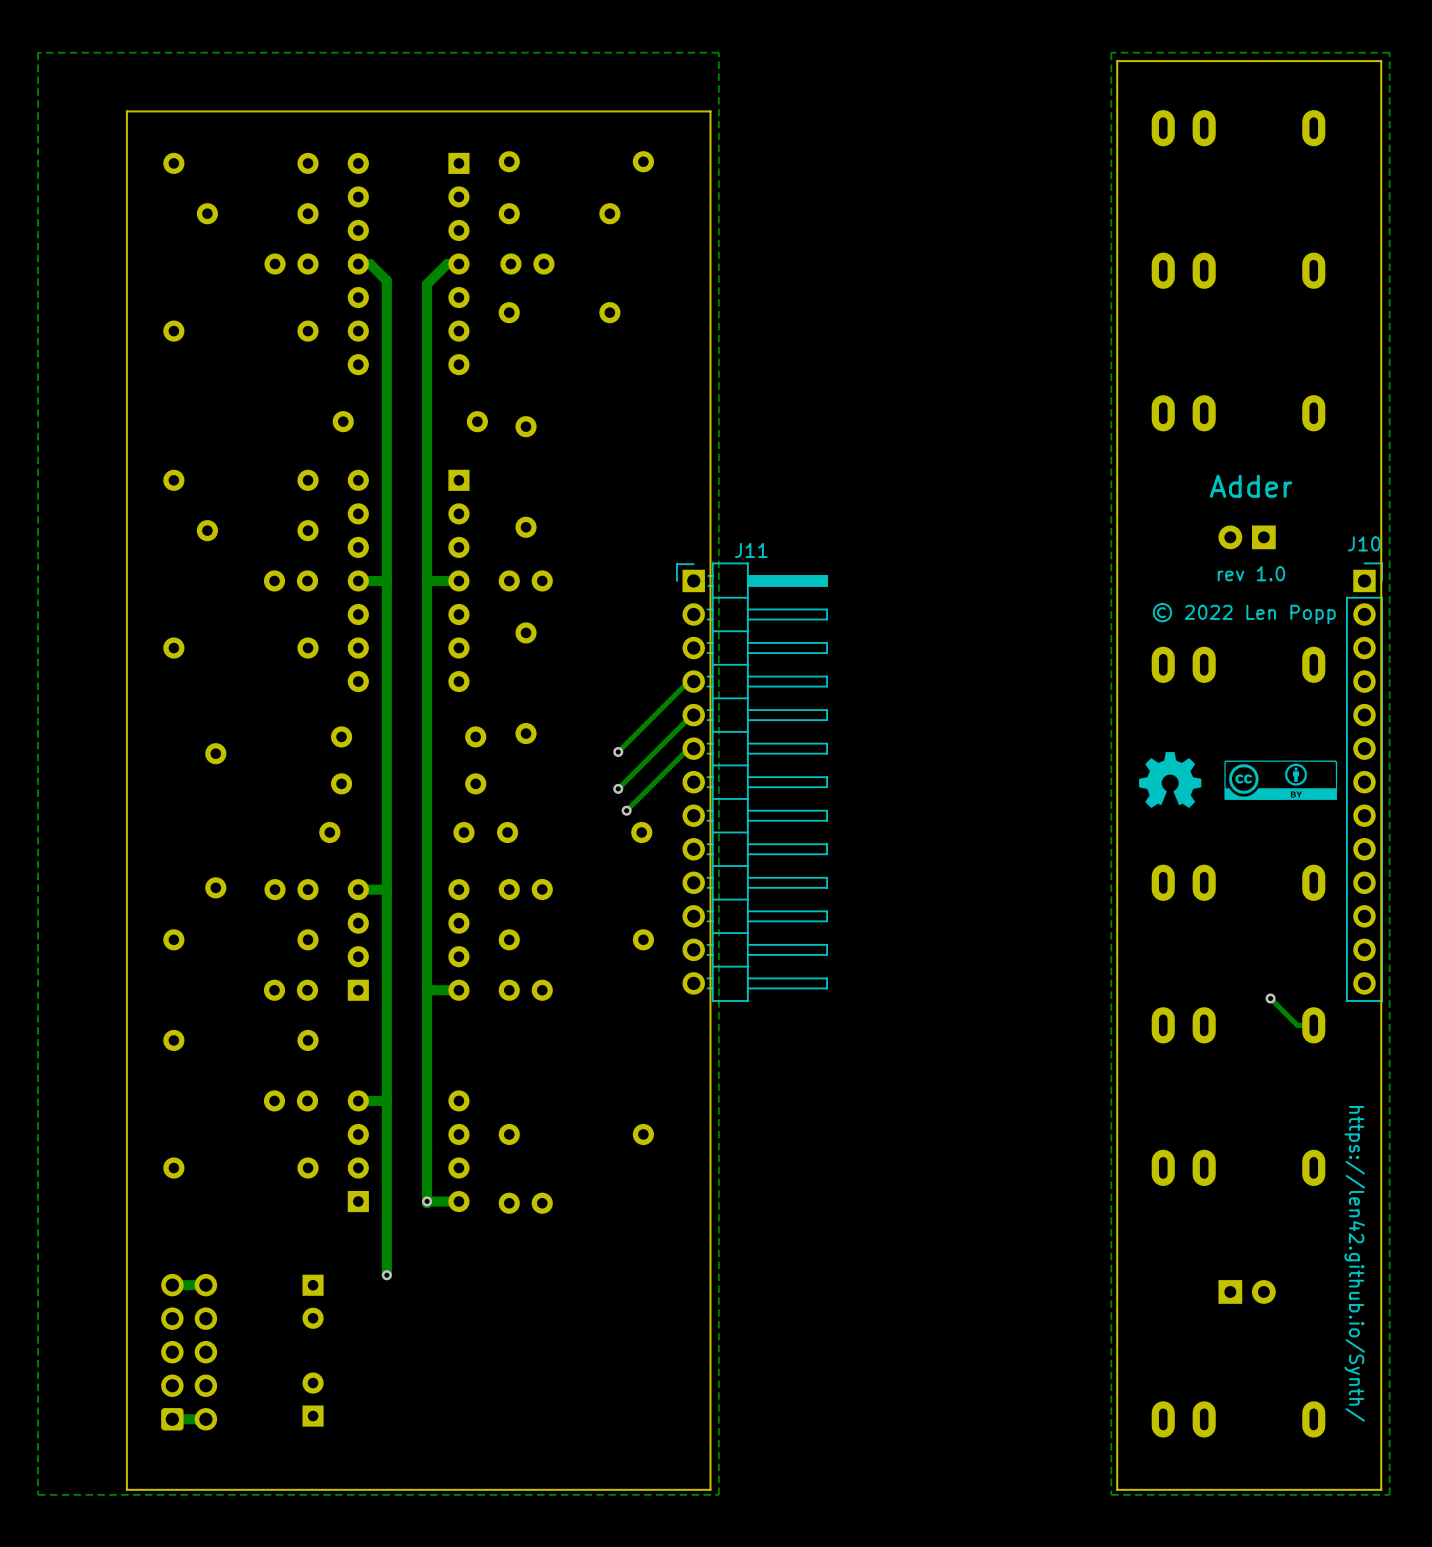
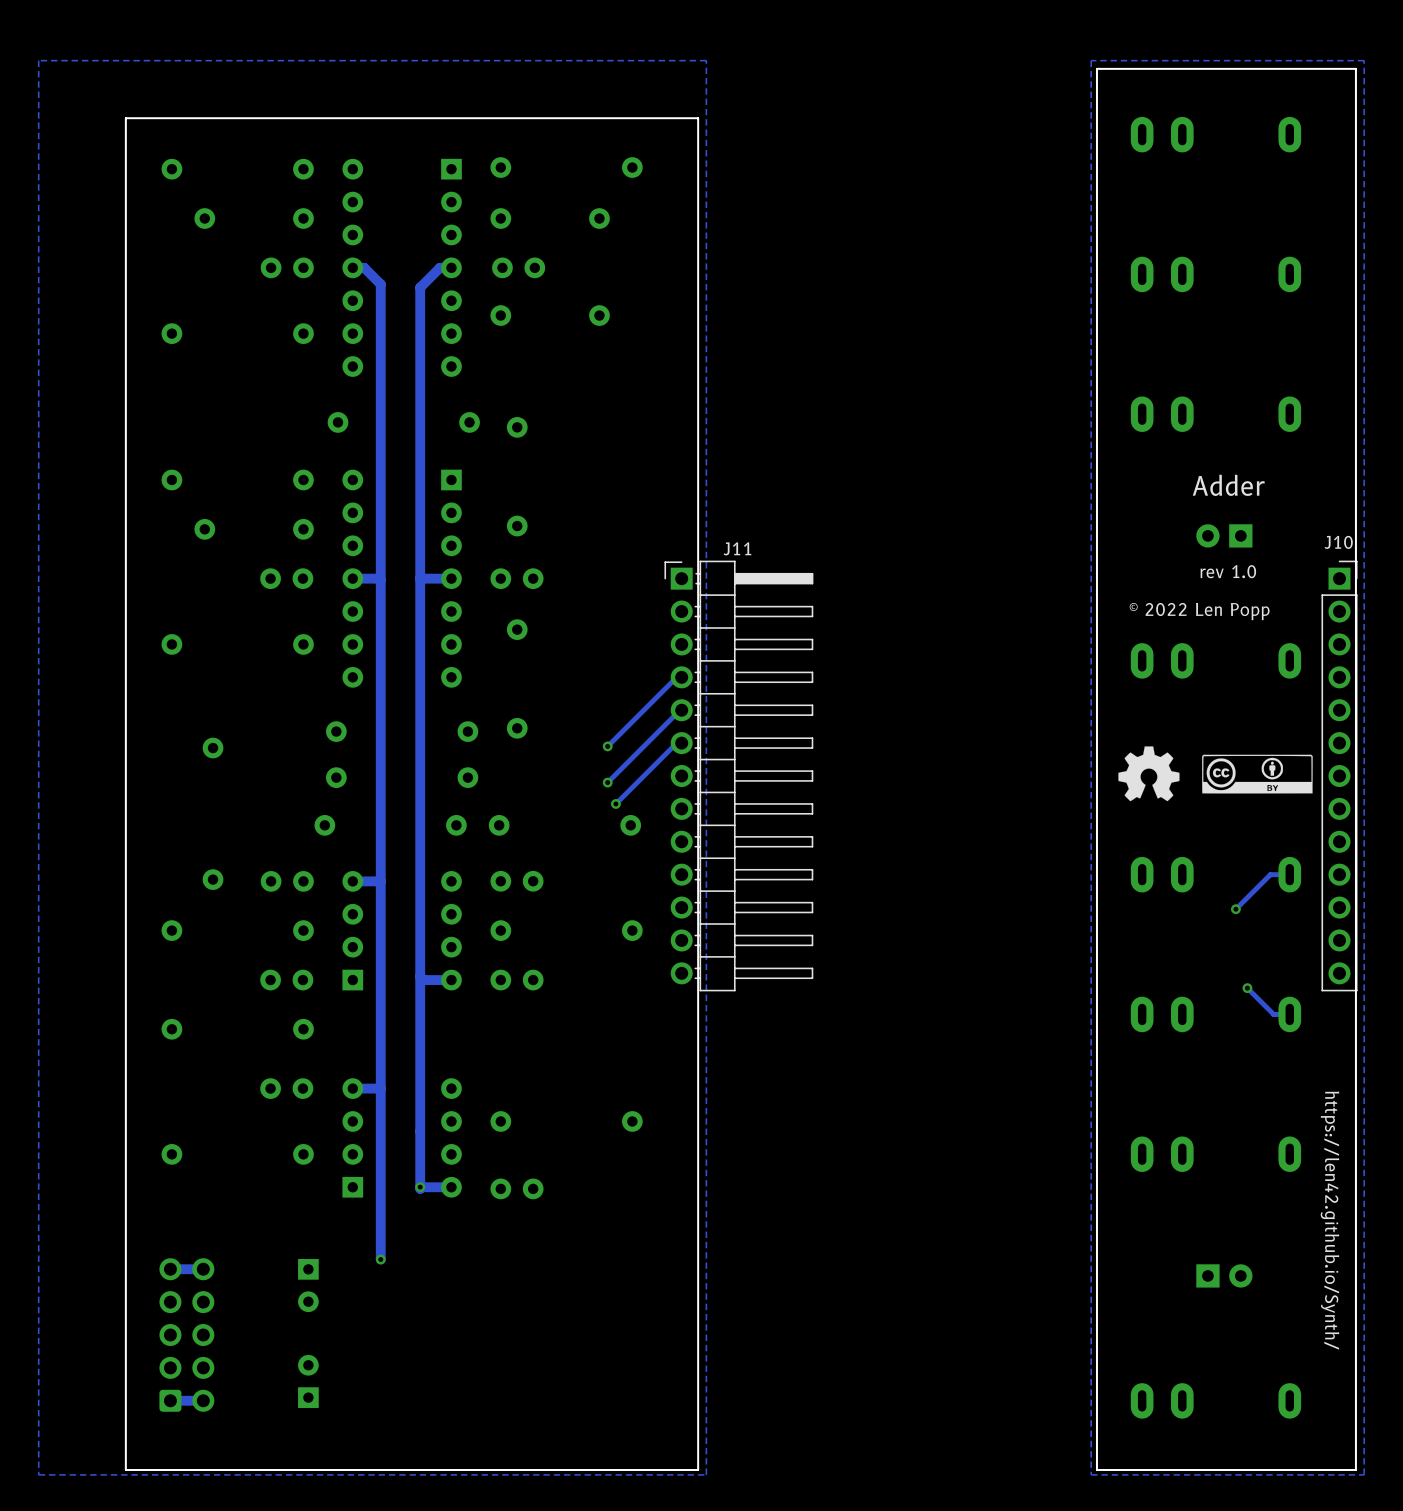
track: none -> (1289, 874) (1270, 874) (1235, 909)
via: none -> (1235, 909)

